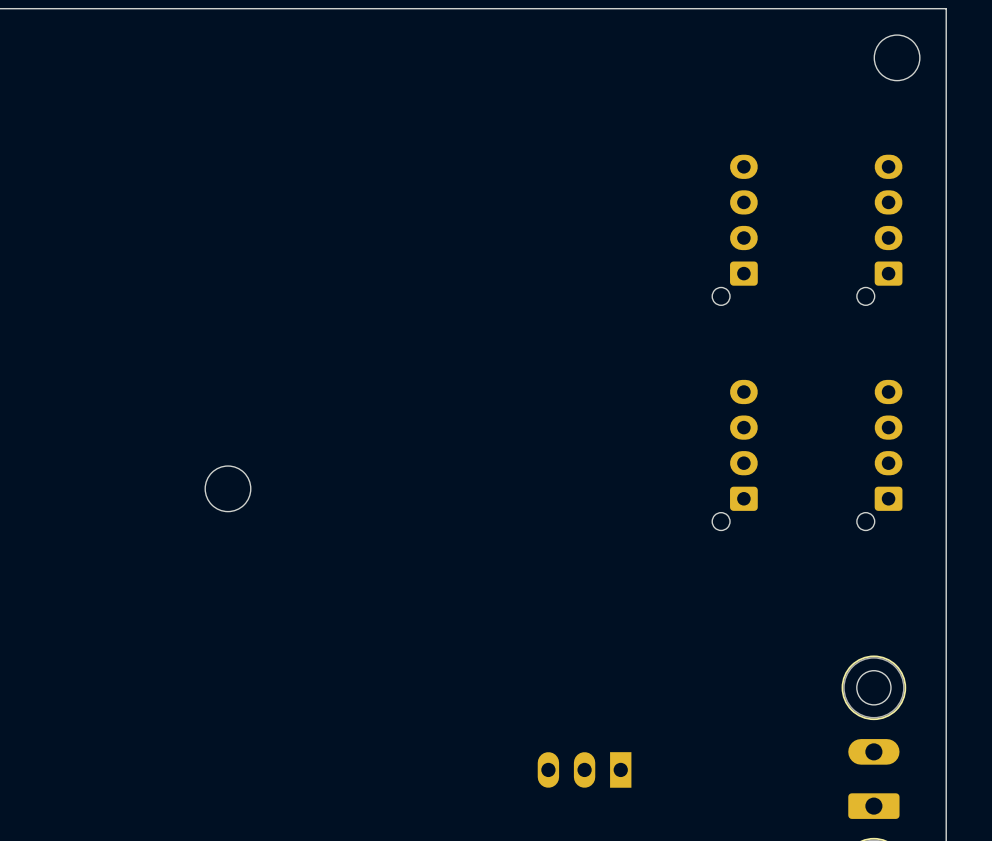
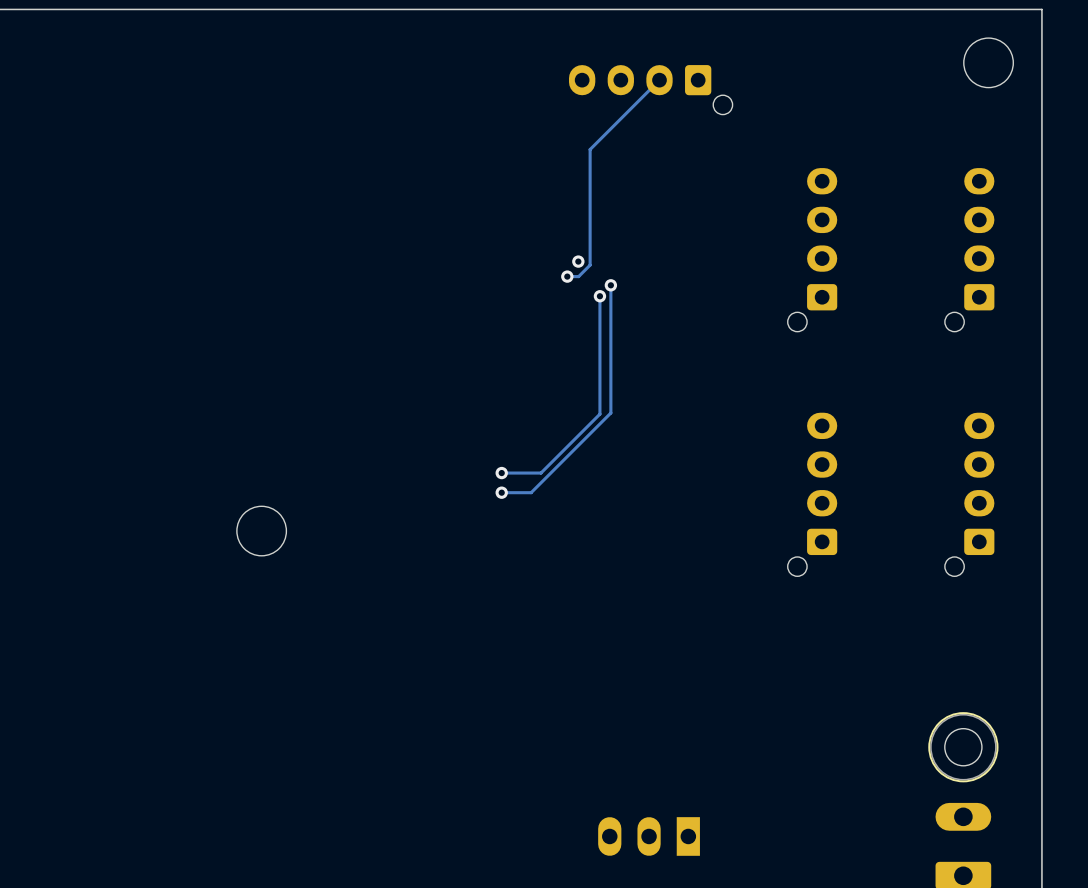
track: none -> (659, 80) (590, 149) (590, 265) (578, 276) (567, 276)
part: none -> (650, 89)
via: none -> (578, 261)
via: none -> (567, 276)
track: none -> (610, 285) (610, 413) (531, 492) (501, 492)
via: none -> (610, 285)
track: none -> (599, 296) (599, 414) (541, 473) (501, 473)
via: none -> (599, 296)
via: none -> (501, 473)
via: none -> (501, 492)

